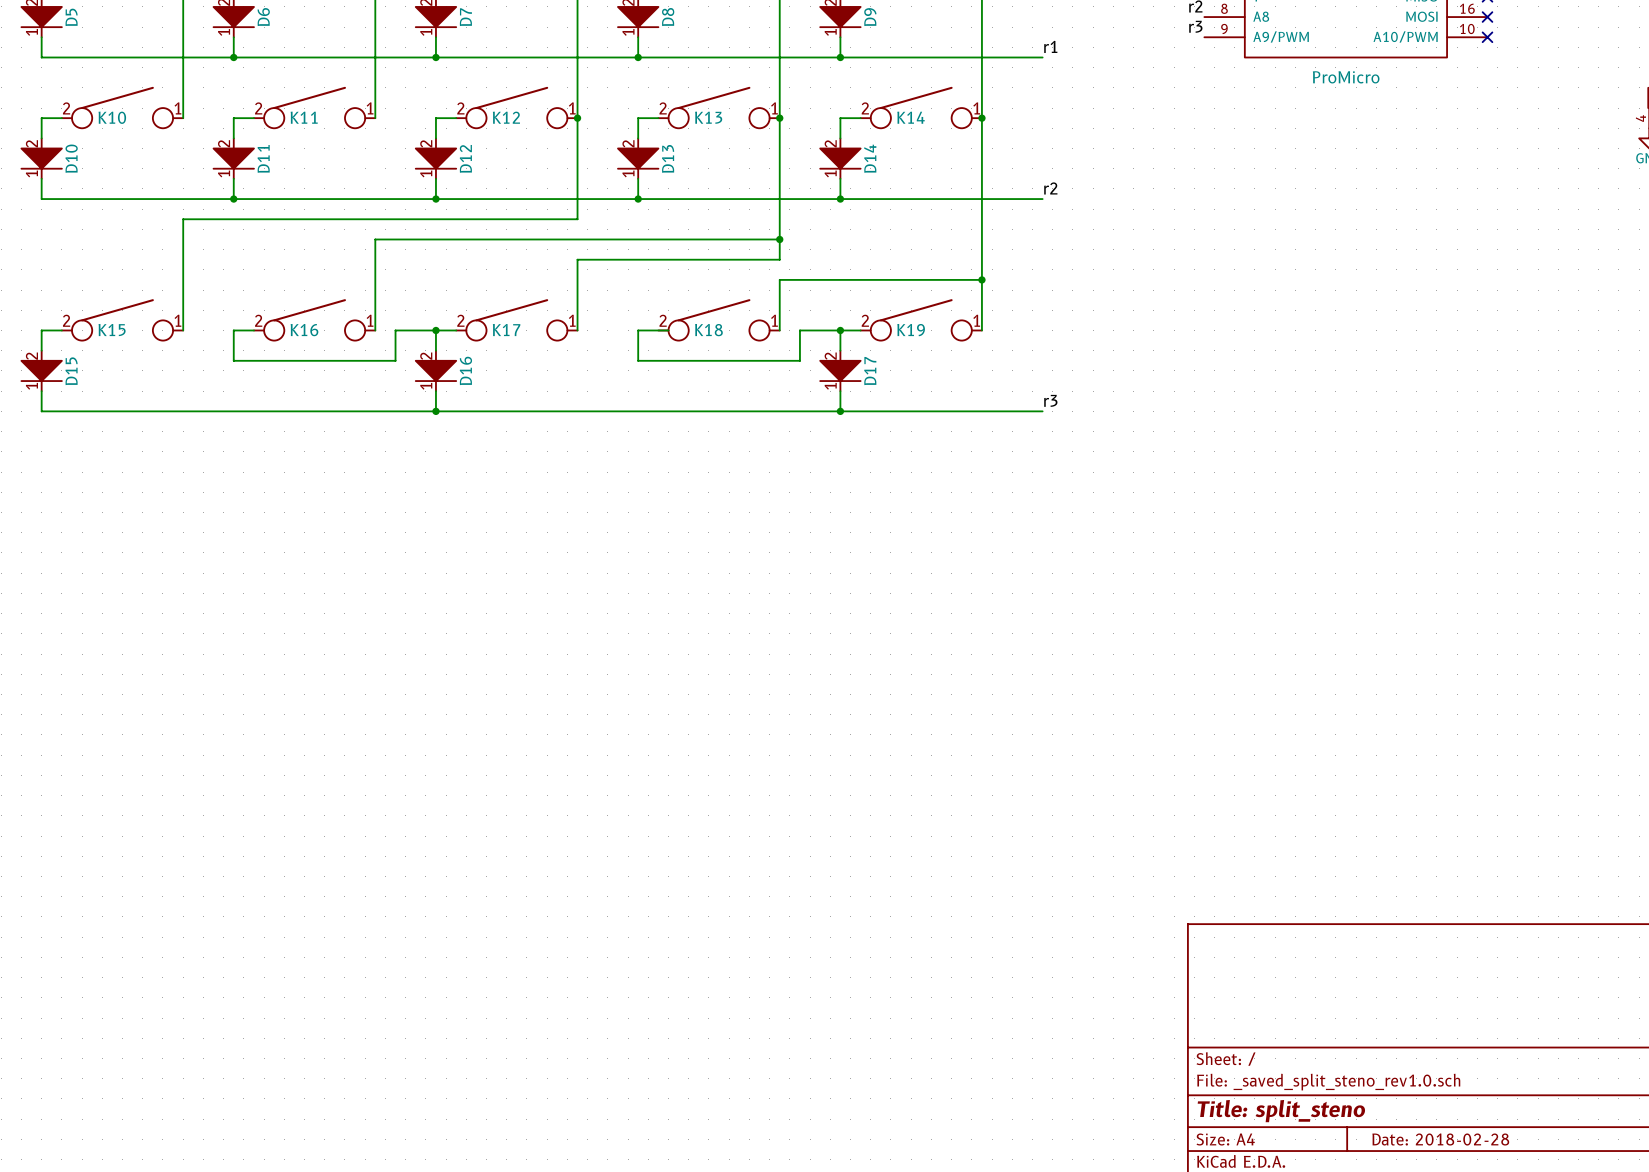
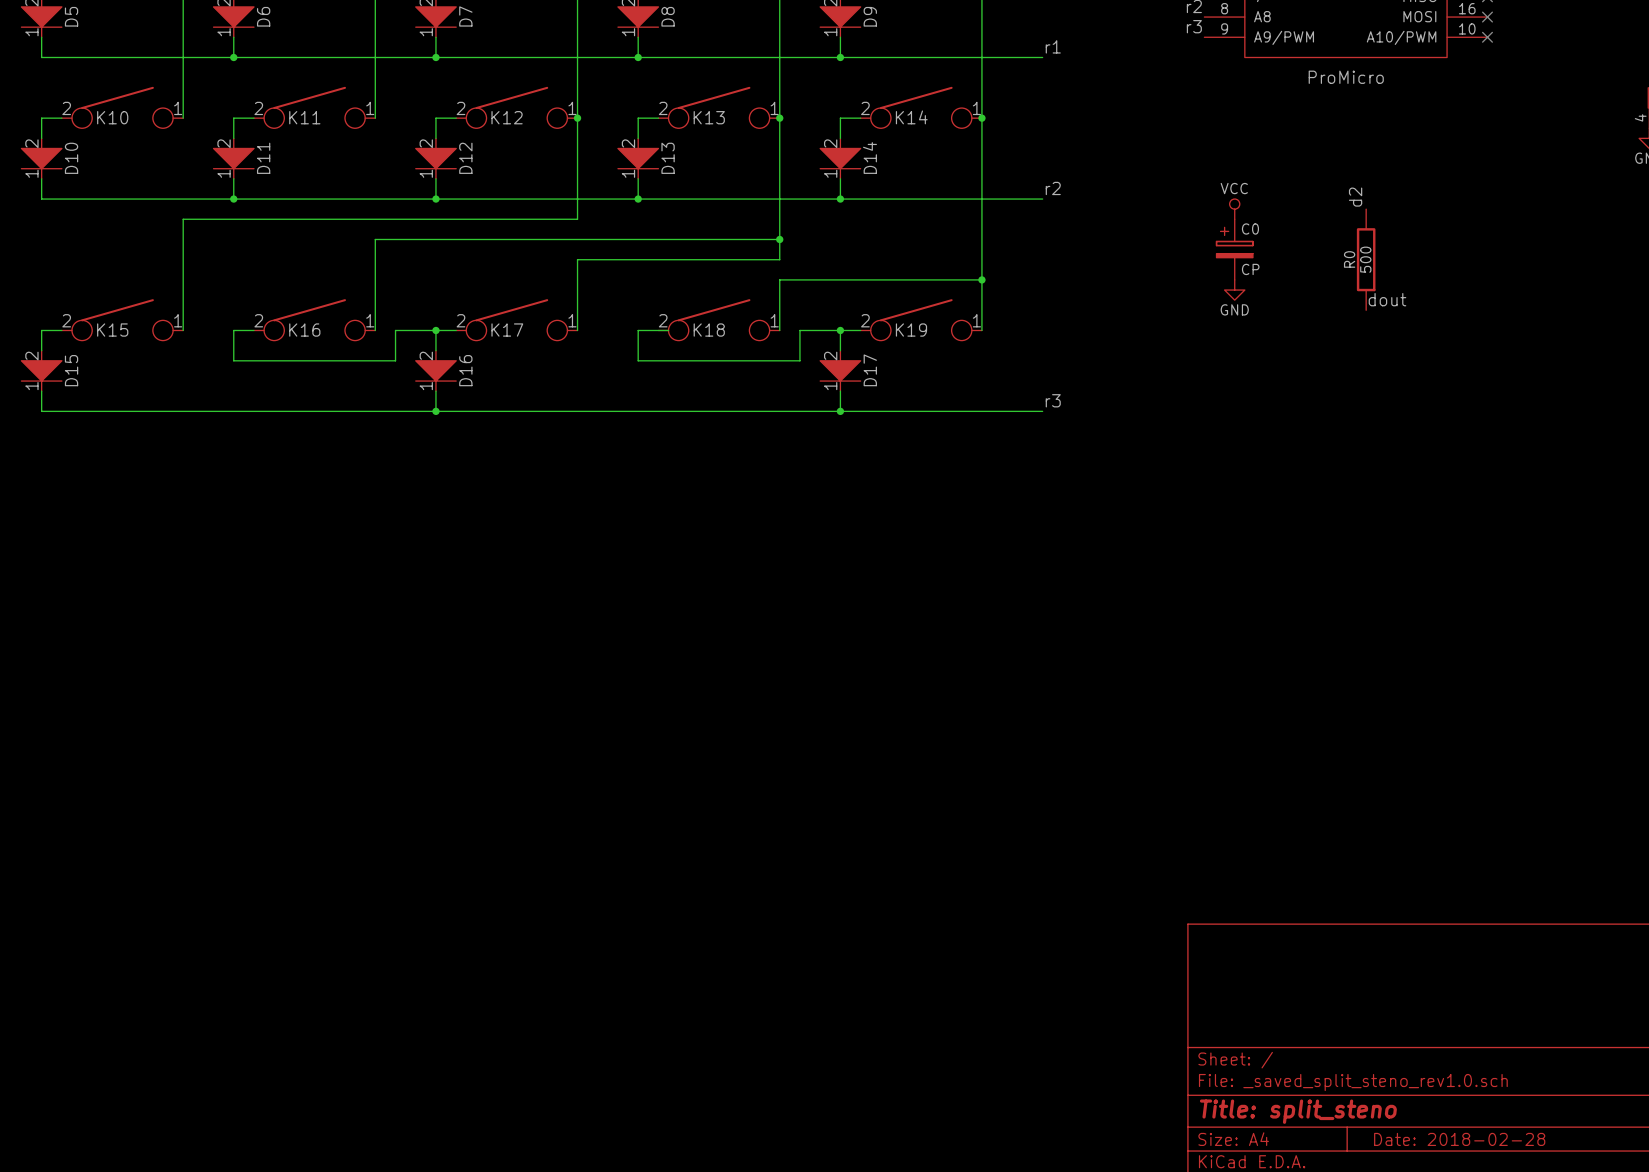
label: none -> d2 (1355, 197)
power symbol: none -> VCC (1234, 209)
C0: none -> CP (1234, 249)
R0: none -> 500 (1366, 259)
power symbol: none -> GND (1234, 290)
label: none -> dout (1387, 299)

